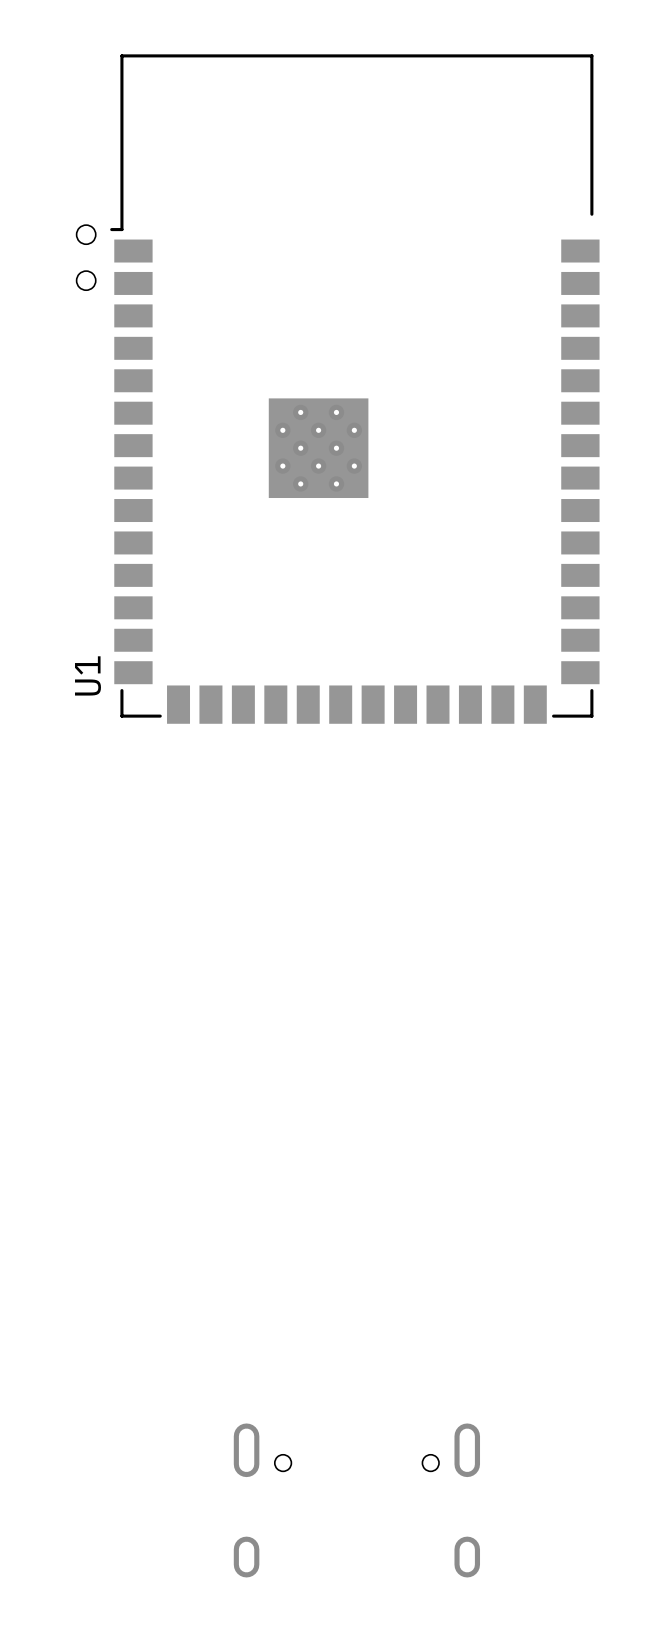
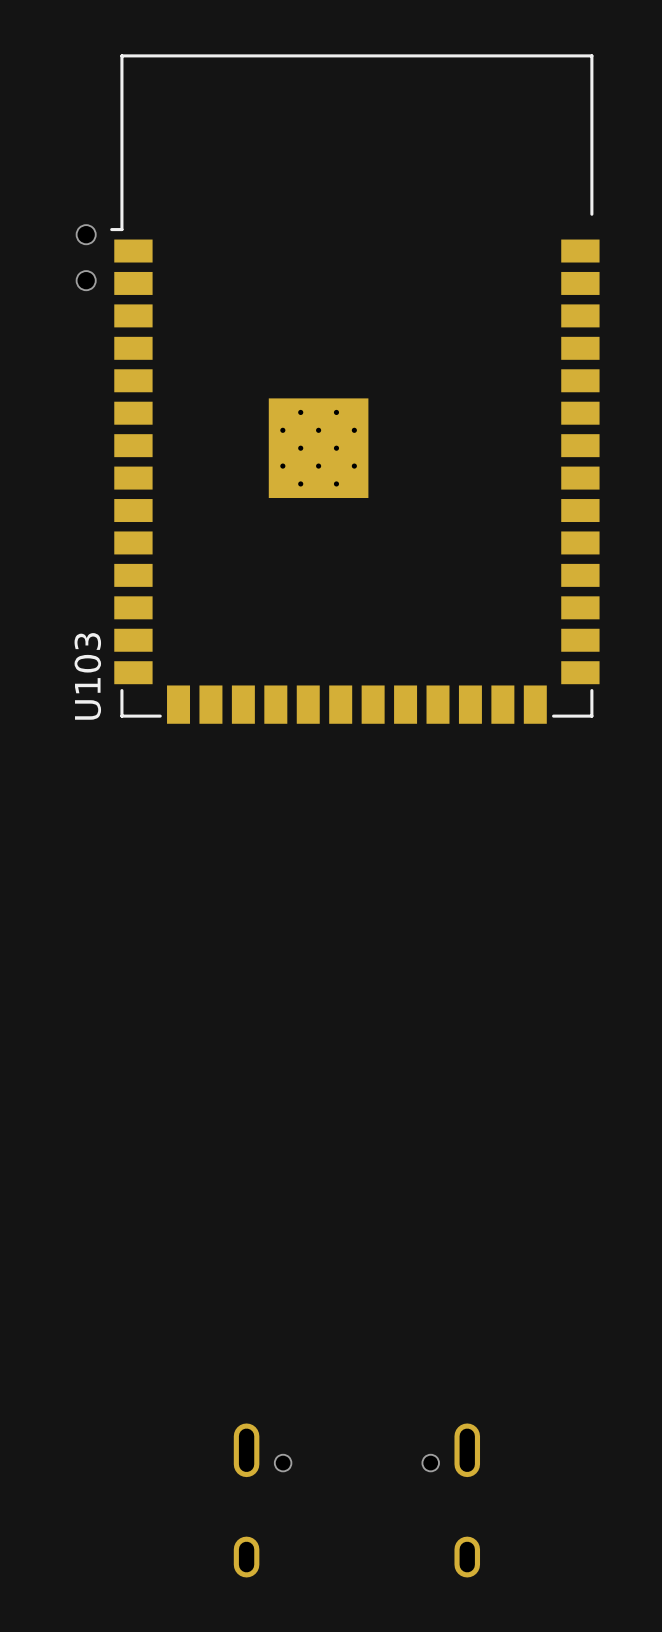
U1 name: U1 (88, 675) -> U103 (87, 676)

